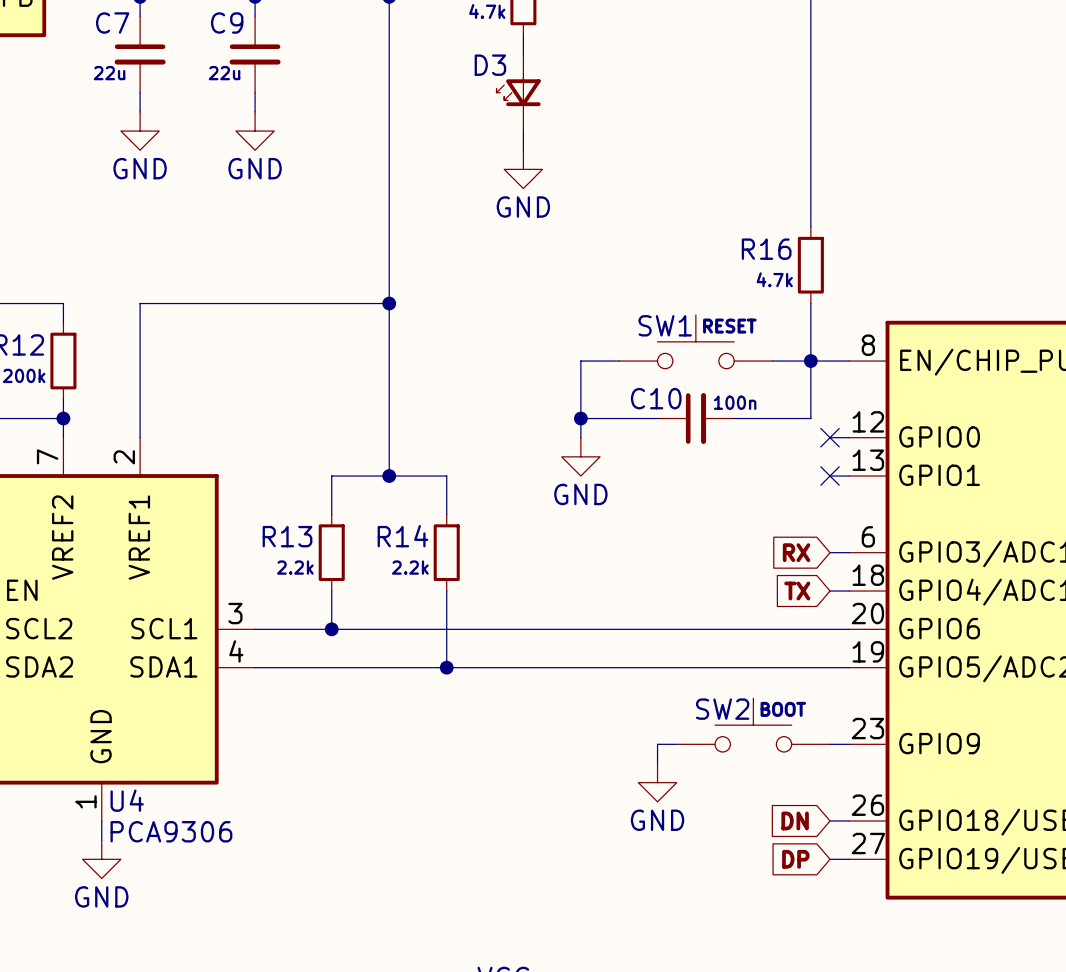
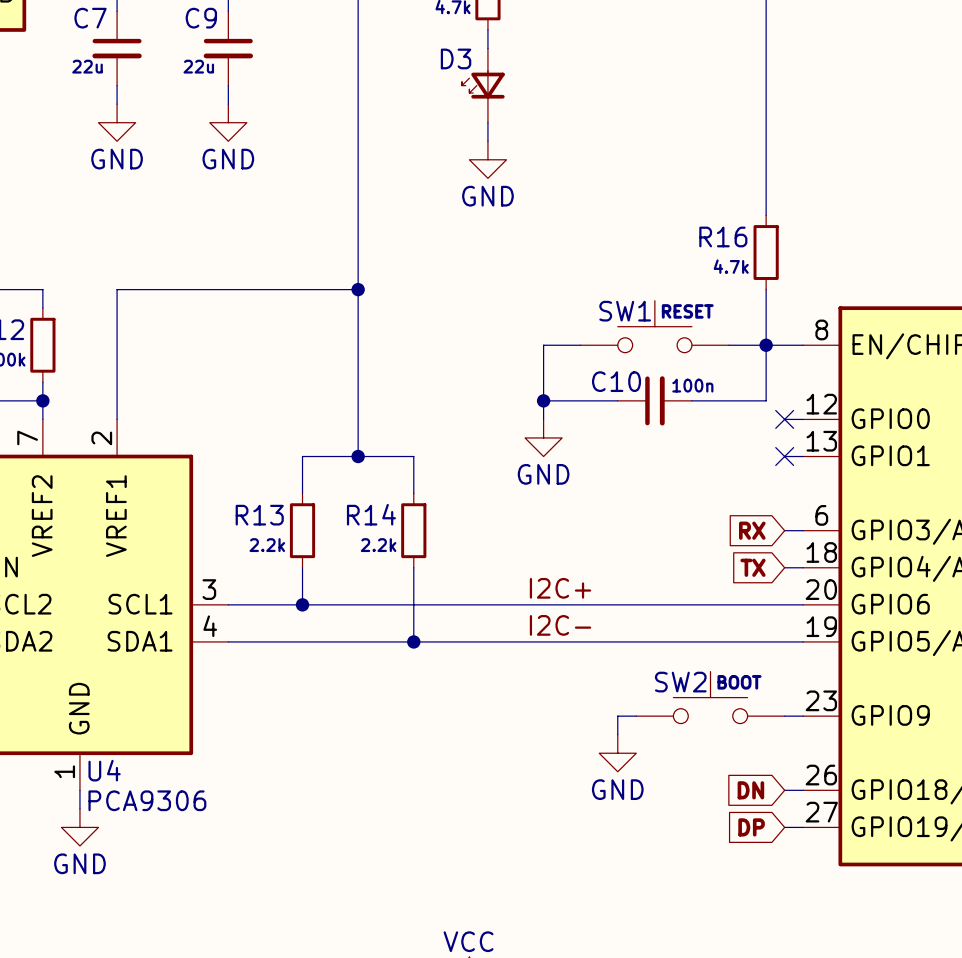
label: none -> I2C+ (560, 588)
label: none -> I2C- (560, 625)

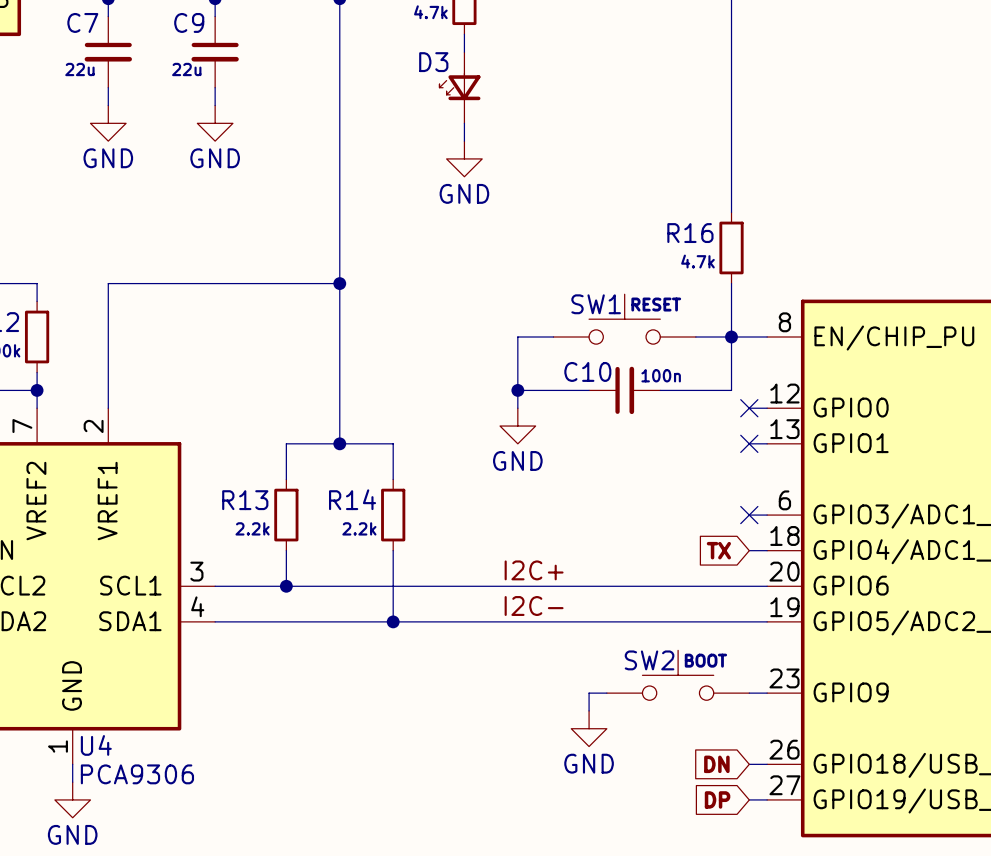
global label: RX (752, 530) -> none
no-connect mark: none -> (749, 515)

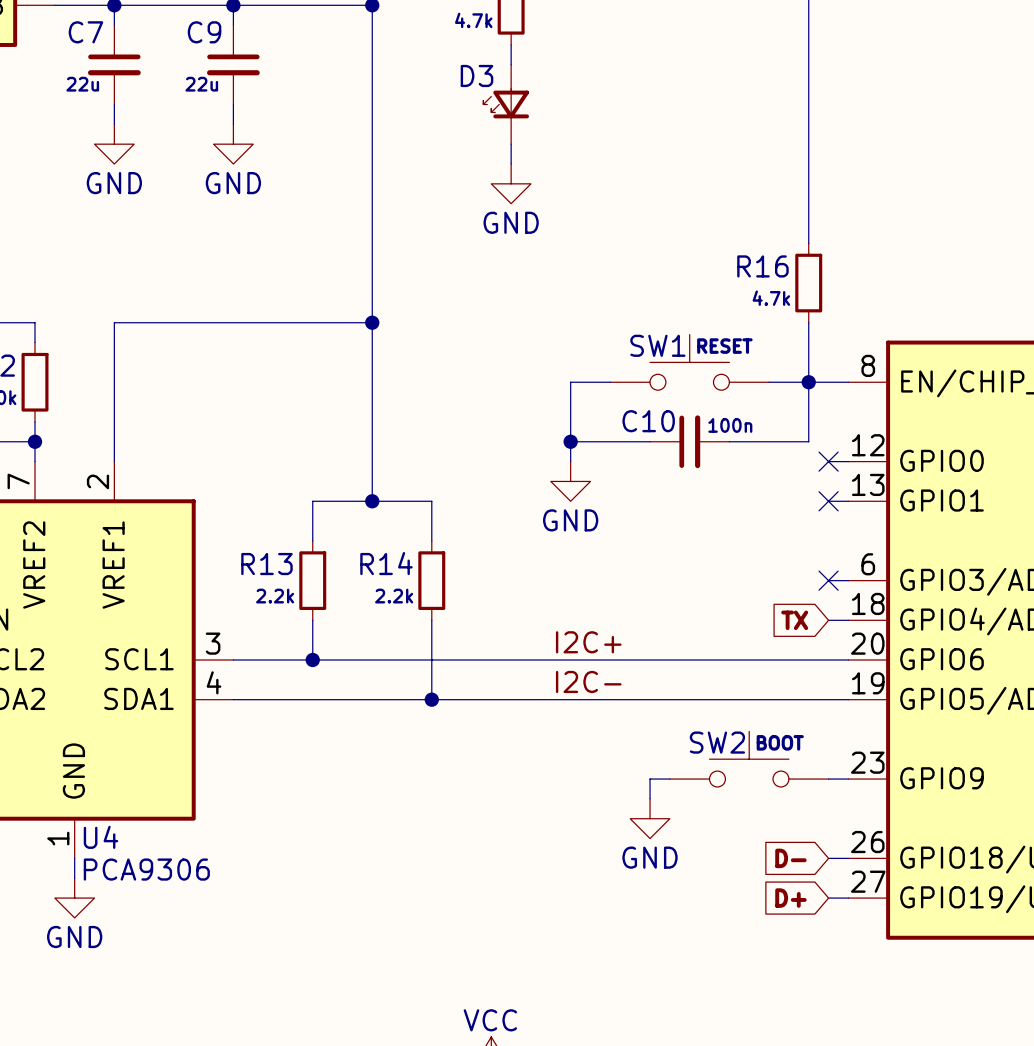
global label: DN (716, 764) -> D- (790, 858)
global label: DP (717, 799) -> D+ (790, 898)

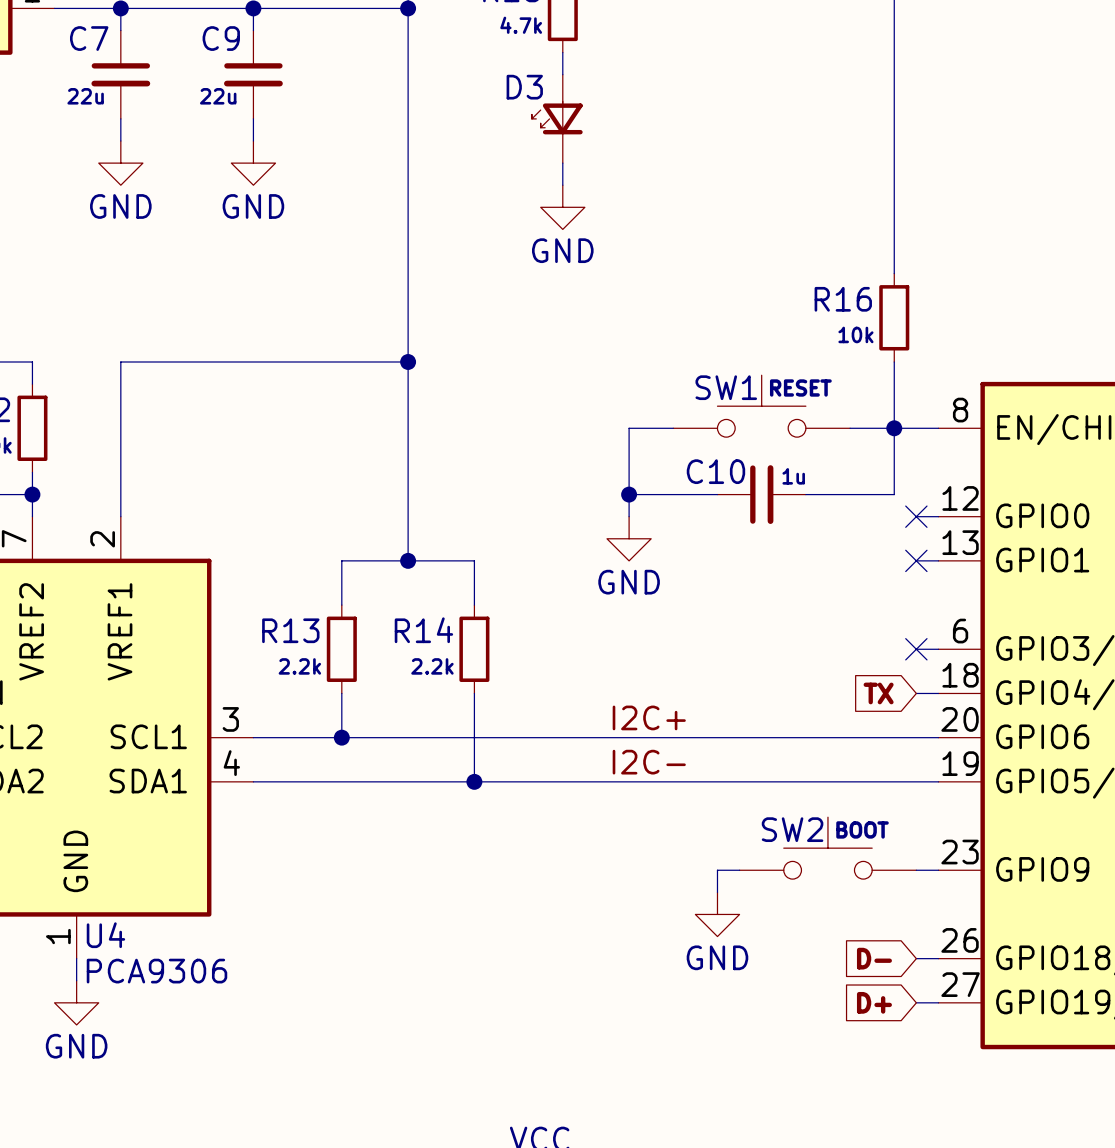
R16 value: 4.7k (771, 298) -> 10k (855, 334)
C10 value: 100n (730, 425) -> 1u (793, 476)

